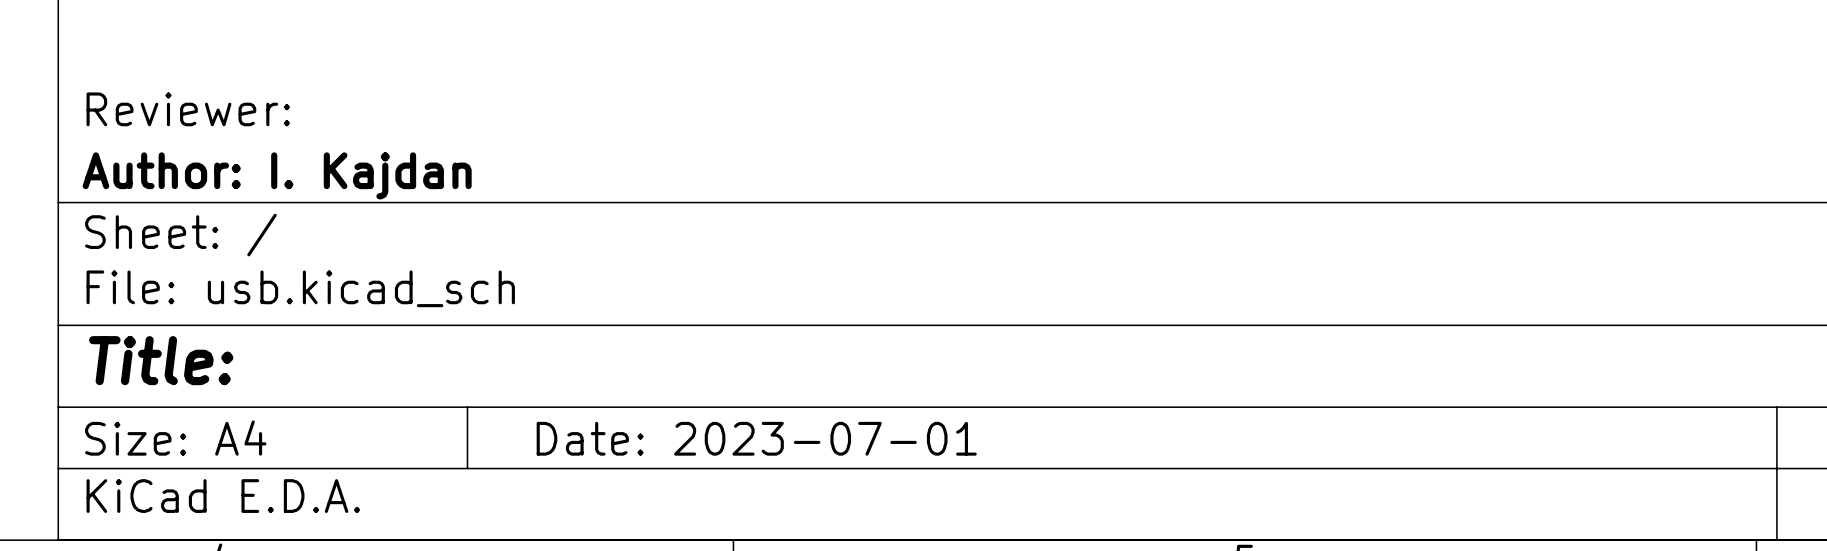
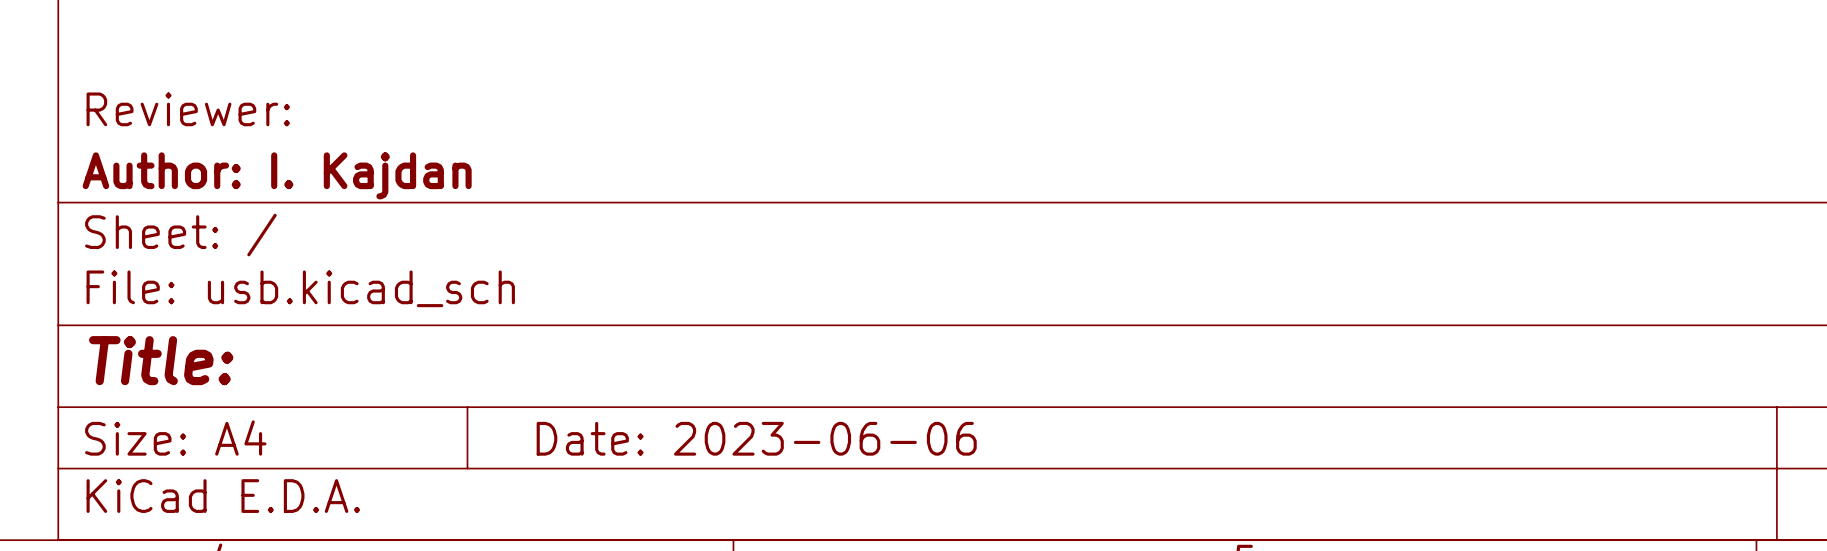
title block: Date: 2023-07-01 (756, 438) -> Date: 2023-06-06 (756, 438)

